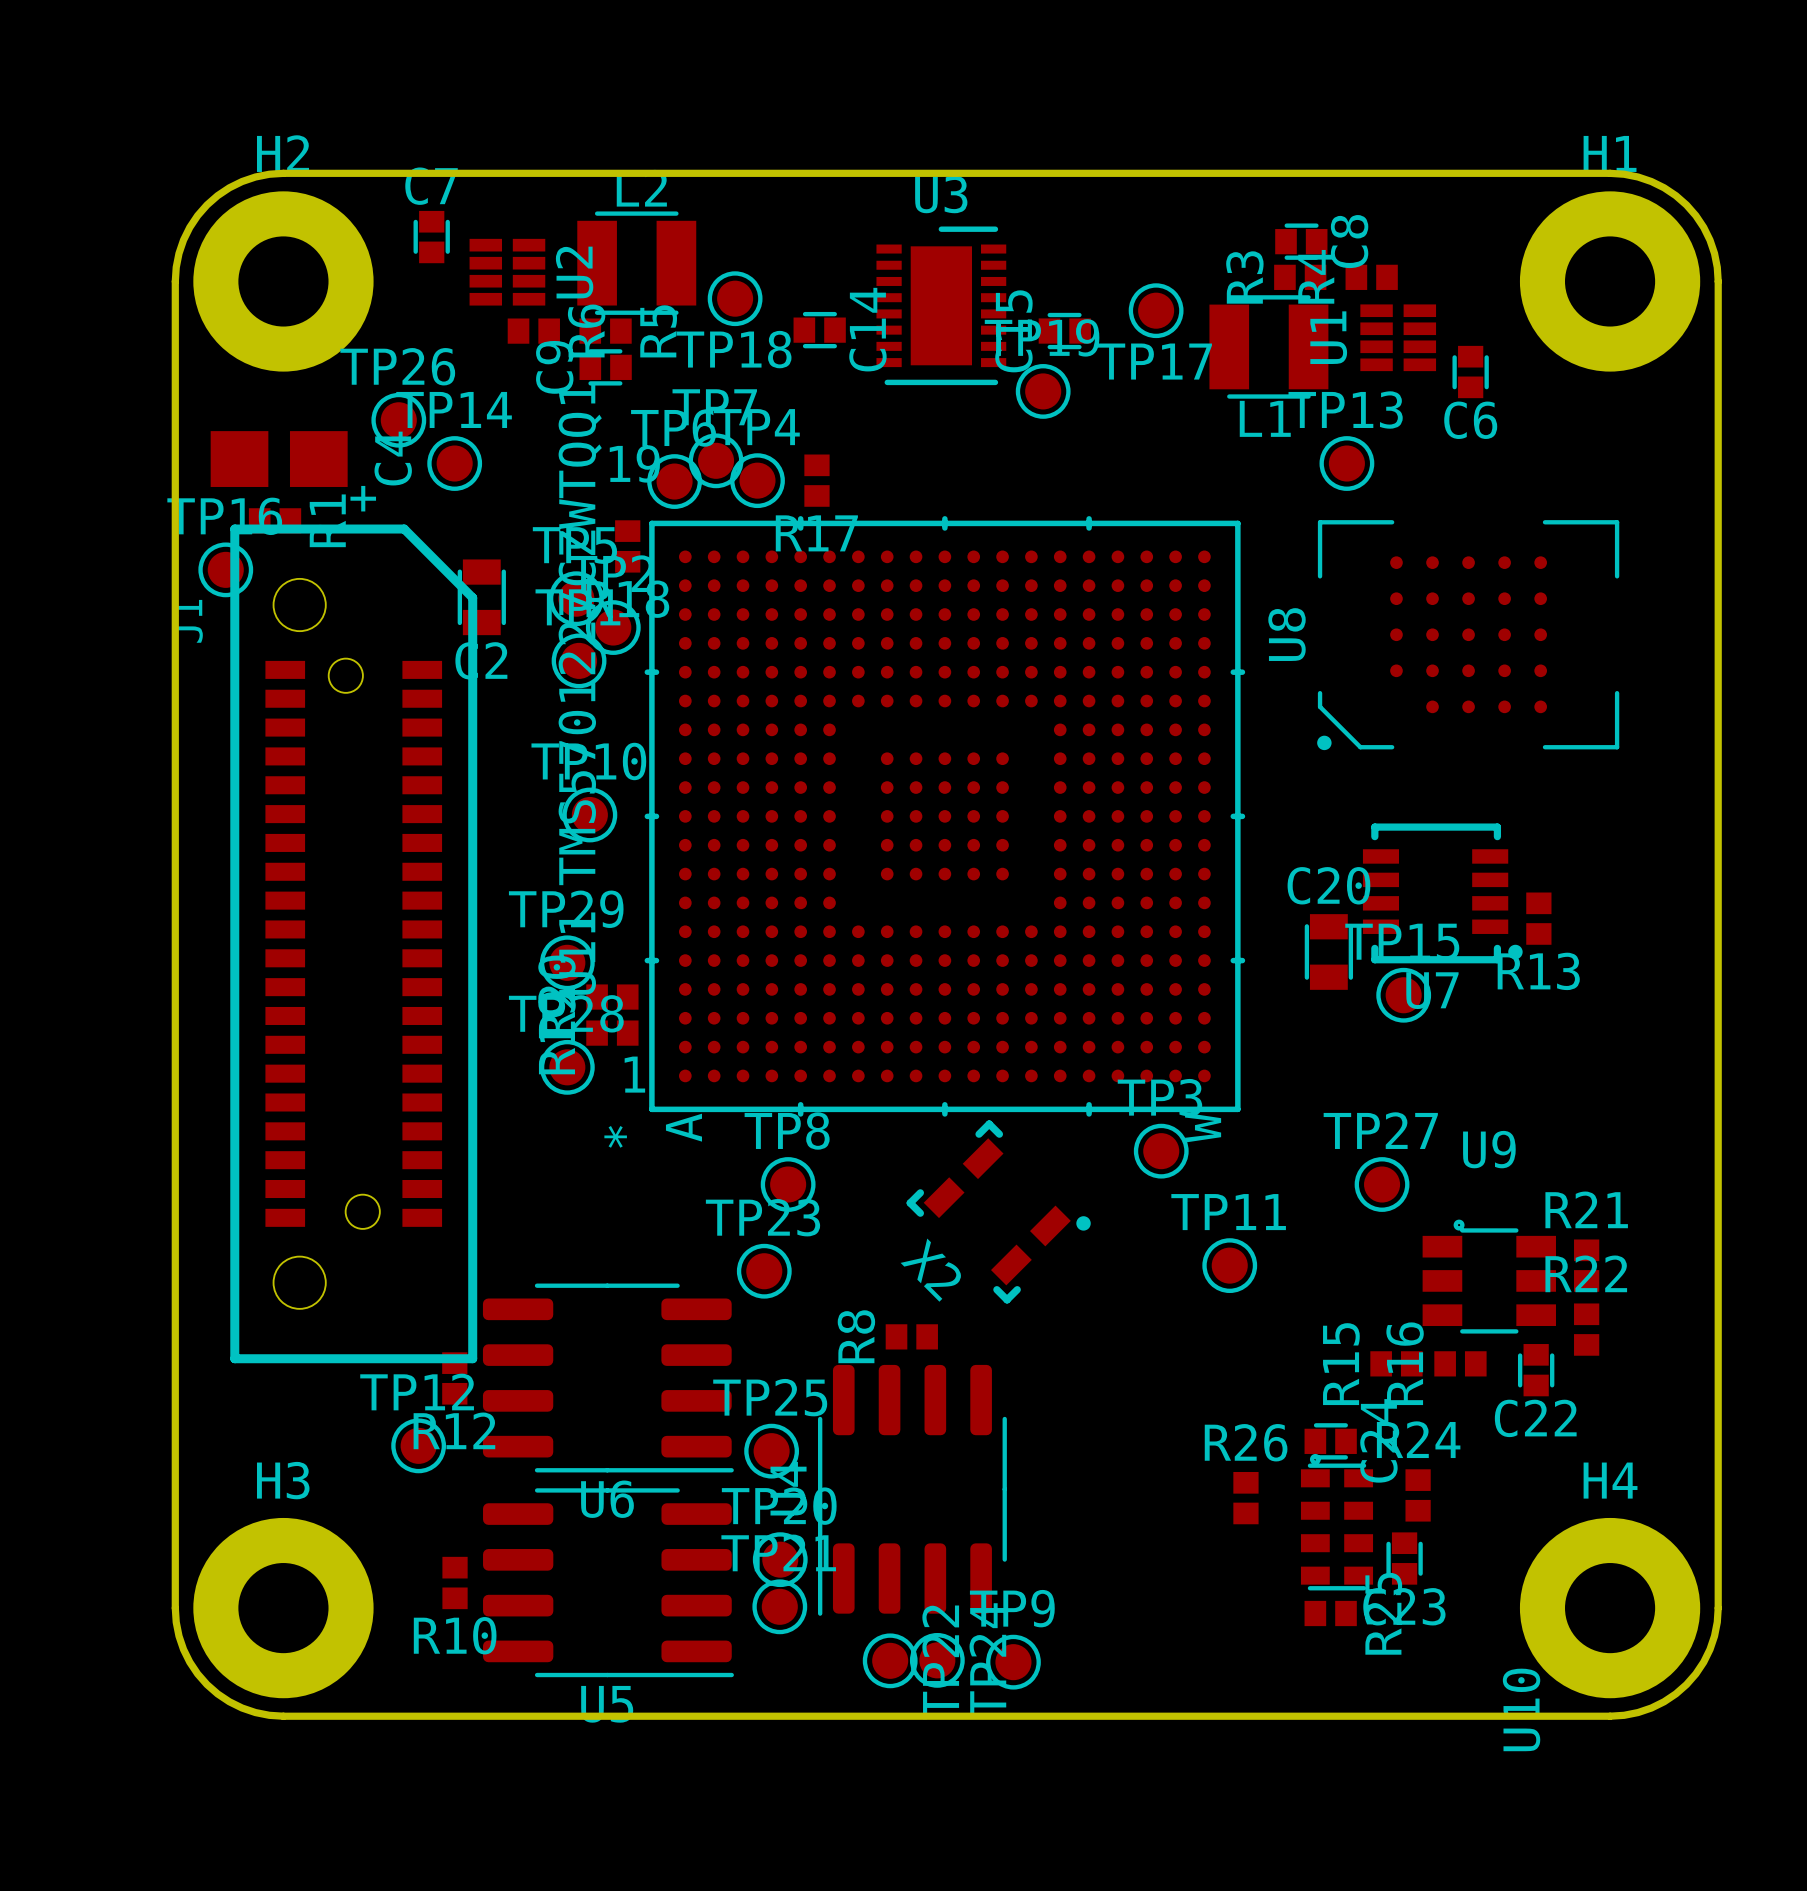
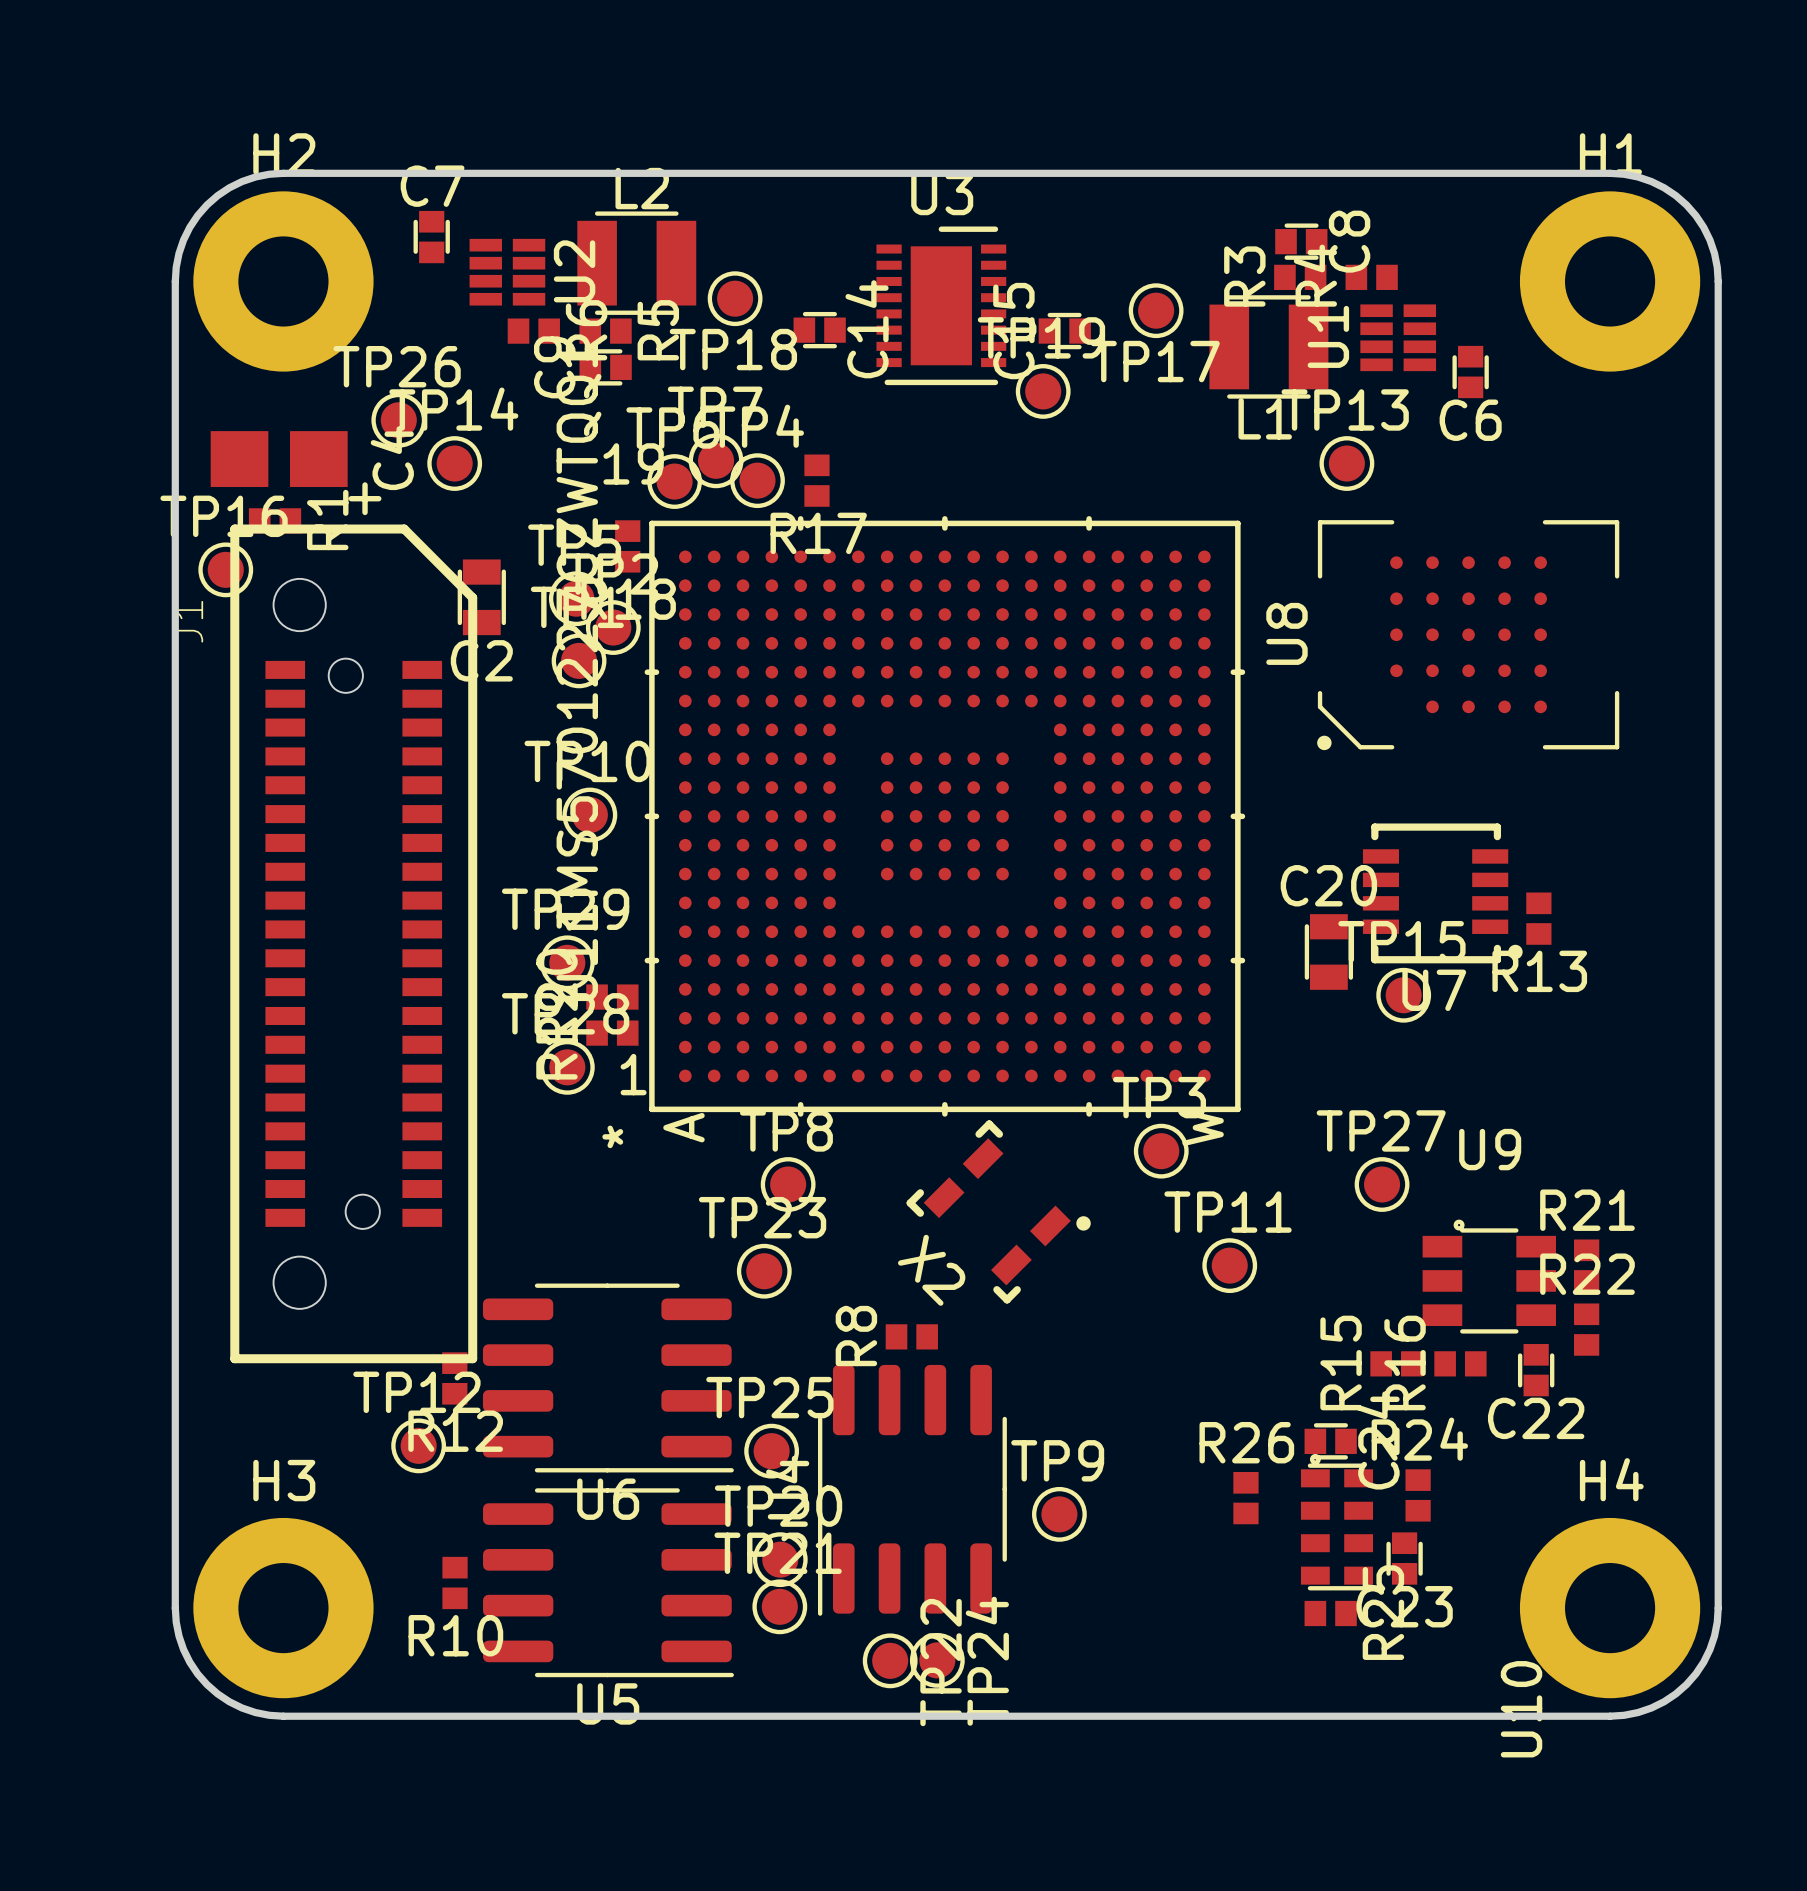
TP9 position: (1013, 1662) -> (1059, 1514)

